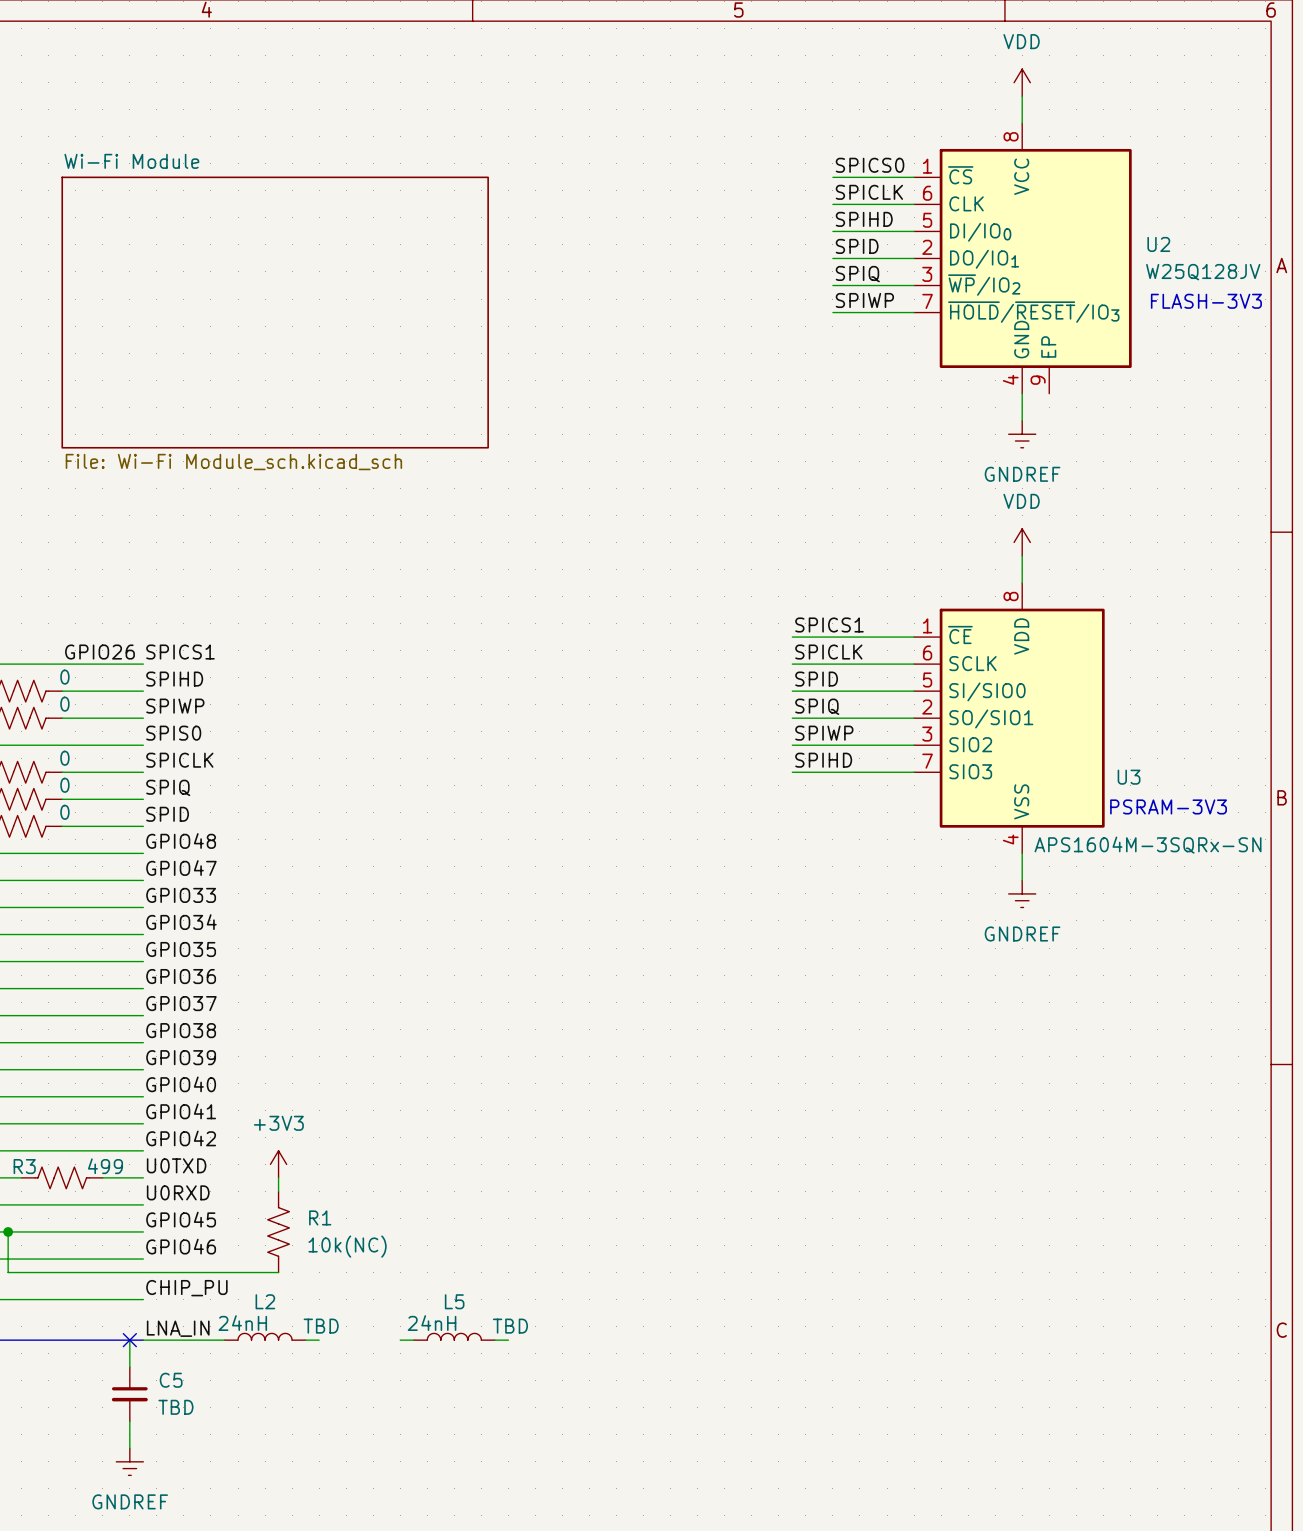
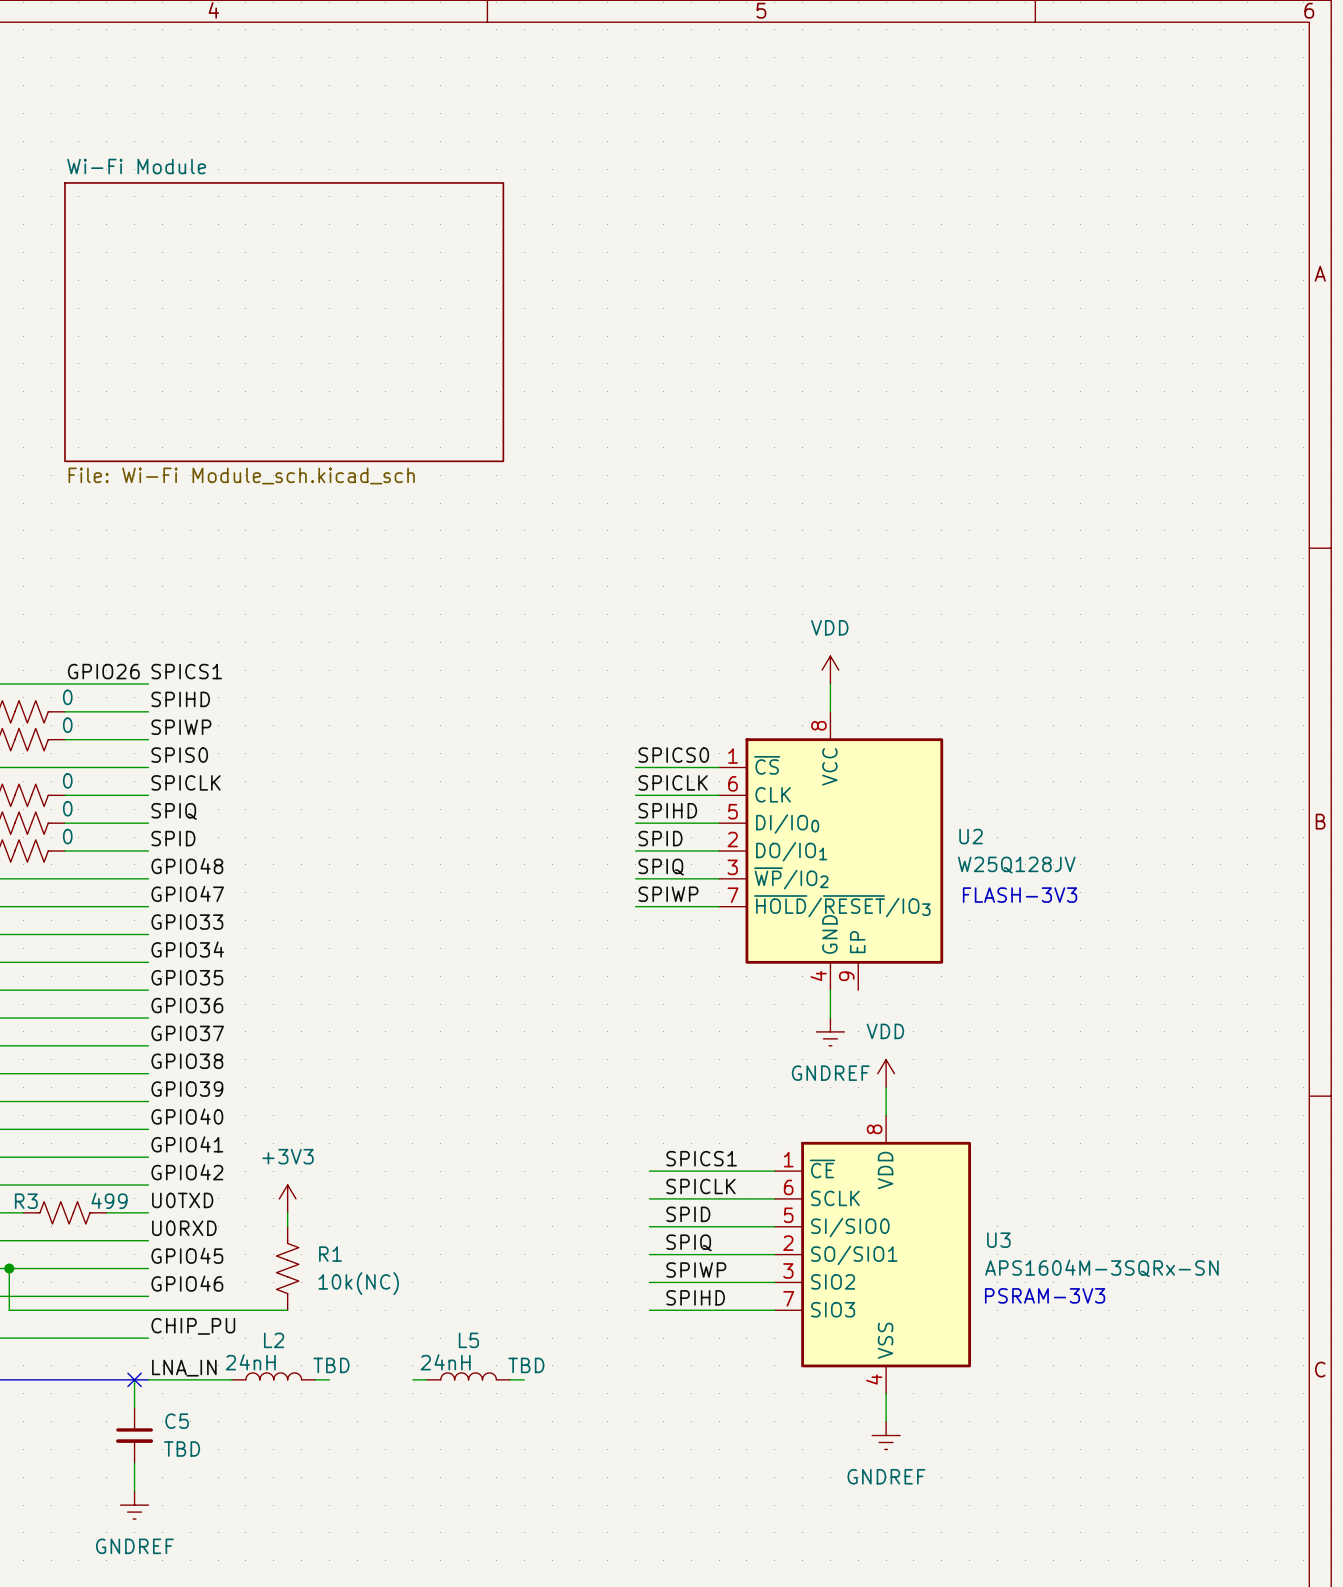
power symbol: VDD (1022, 82) -> none
wire: (1022, 96) (1022, 123) -> none
label: SPICS0 (870, 165) -> none
wire: (832, 177) (914, 177) -> none
label: SPICLK (869, 192) -> none
wire: (832, 204) (914, 204) -> none
label: SPIHD (864, 219) -> none
wire: (832, 231) (914, 231) -> none
label: SPID (857, 246) -> none
wire: (832, 258) (914, 258) -> none
U2 position: (1022, 258) -> (831, 851)
label: SPIQ (857, 274) -> none
wire: (832, 285) (914, 285) -> none
label: SPIWP (864, 300) -> none
text: FLASH-3V3 (1206, 301) -> none
wire: (832, 312) (914, 312) -> none
wire: (1022, 393) (1022, 420) -> none
power symbol: GNDREF (1022, 434) -> none
power symbol position: VDD (1022, 542) -> VDD (830, 670)
wire: (1022, 555) (1022, 582) -> (830, 683) (830, 711)
label: SPICS1 (829, 624) -> none
wire: (792, 637) (914, 637) -> none
label position: SPICLK (828, 652) -> SPICLK (673, 782)
wire: (792, 664) (914, 664) -> none
label position: SPID (816, 679) -> SPID (660, 838)
wire: (792, 691) (914, 691) -> none
label position: SPIQ (817, 706) -> SPIQ (661, 867)
U3 position: (1009, 718) -> (872, 1254)
label: none -> SPICS0 (673, 755)
label position: SPIWP (824, 733) -> SPIWP (668, 894)
wire: none -> (635, 767) (719, 767)
label position: SPIHD (823, 760) -> SPIHD (667, 810)
wire: none -> (635, 795) (719, 795)
U3 name position: U3 (1129, 777) -> U3 (998, 1240)
wire: none -> (635, 823) (719, 823)
text: PSRAM-3V3 (1168, 806) -> none
wire: none -> (635, 851) (719, 851)
U3 value position: APS1604M-3SQRx-SN (1148, 845) -> APS1604M-3SQRx-SN (1101, 1268)
wire: none -> (635, 878) (719, 878)
wire: (1022, 853) (1022, 880) -> (830, 990) (830, 1018)
text: none -> FLASH-3V3 (1020, 895)
wire: none -> (635, 906) (719, 906)
power symbol position: GNDREF (1022, 893) -> GNDREF (830, 1031)
power symbol: none -> VDD (886, 1073)
wire: none -> (886, 1087) (886, 1115)
label: none -> SPICS1 (701, 1158)
wire: none -> (649, 1171) (774, 1171)
label: none -> SPICLK (700, 1186)
wire: none -> (649, 1198) (774, 1198)
label: none -> SPID (688, 1214)
wire: none -> (649, 1226) (774, 1226)
label: none -> SPIQ (689, 1242)
wire: none -> (649, 1254) (774, 1254)
label: none -> SPIWP (696, 1270)
wire: none -> (649, 1282) (774, 1282)
text: none -> PSRAM-3V3 (1045, 1295)
label: none -> SPIHD (695, 1297)
wire: none -> (649, 1310) (774, 1310)
wire: none -> (886, 1393) (886, 1421)
power symbol: none -> GNDREF (886, 1435)

